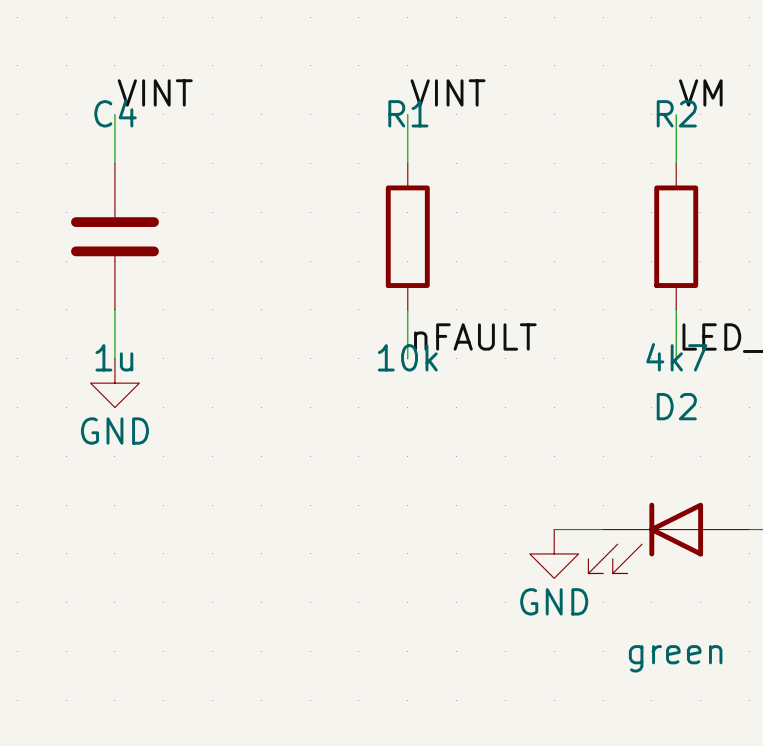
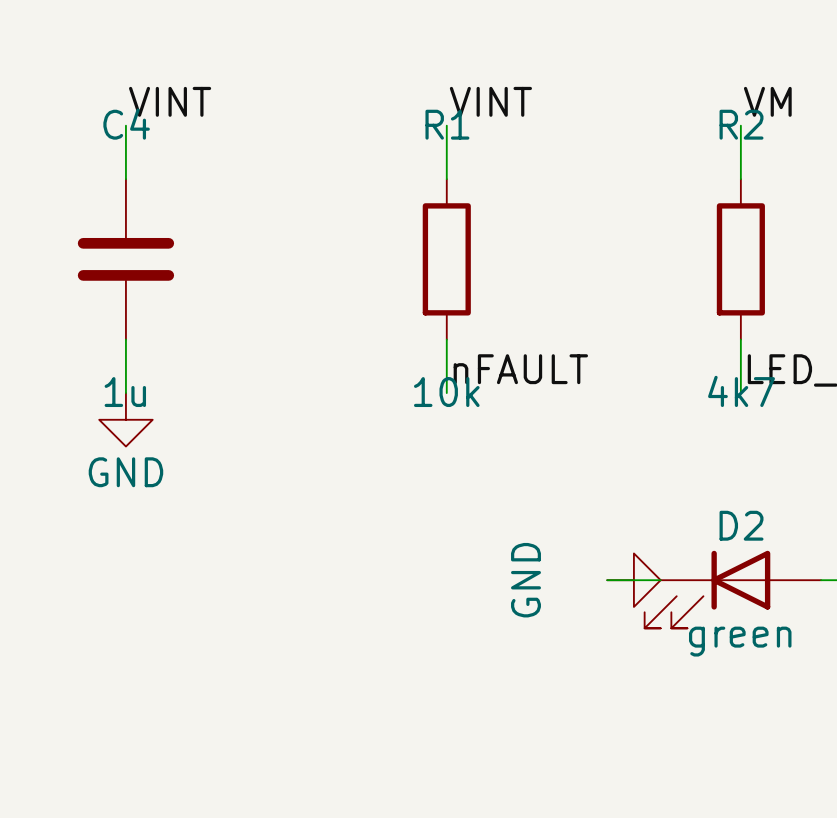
D2 name position: D2 (676, 406) -> D2 (741, 525)
power symbol rotation: 0° (554, 553) -> 90° counterclockwise (633, 580)
power symbol position: GND (554, 553) -> GND (633, 580)
power symbol text position: GND (554, 601) -> GND (525, 580)
D2 value position: green (675, 658) -> green (740, 641)

